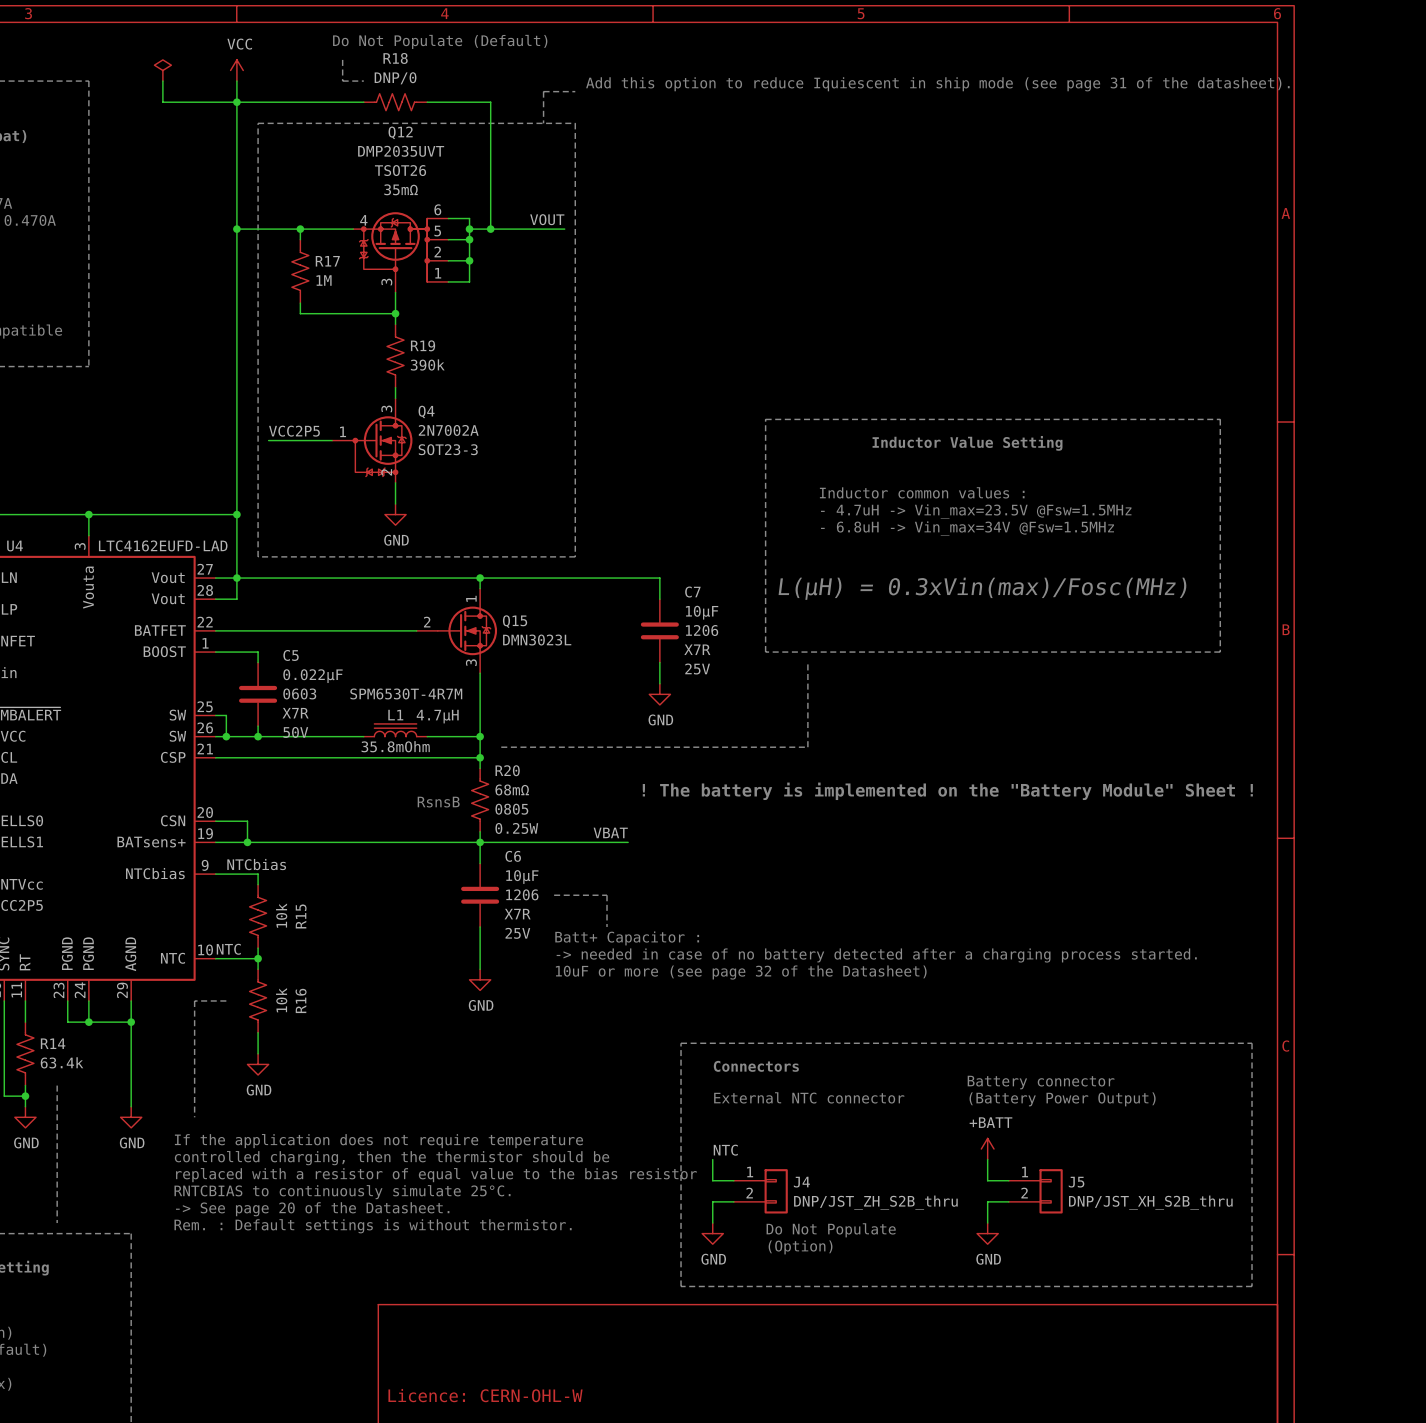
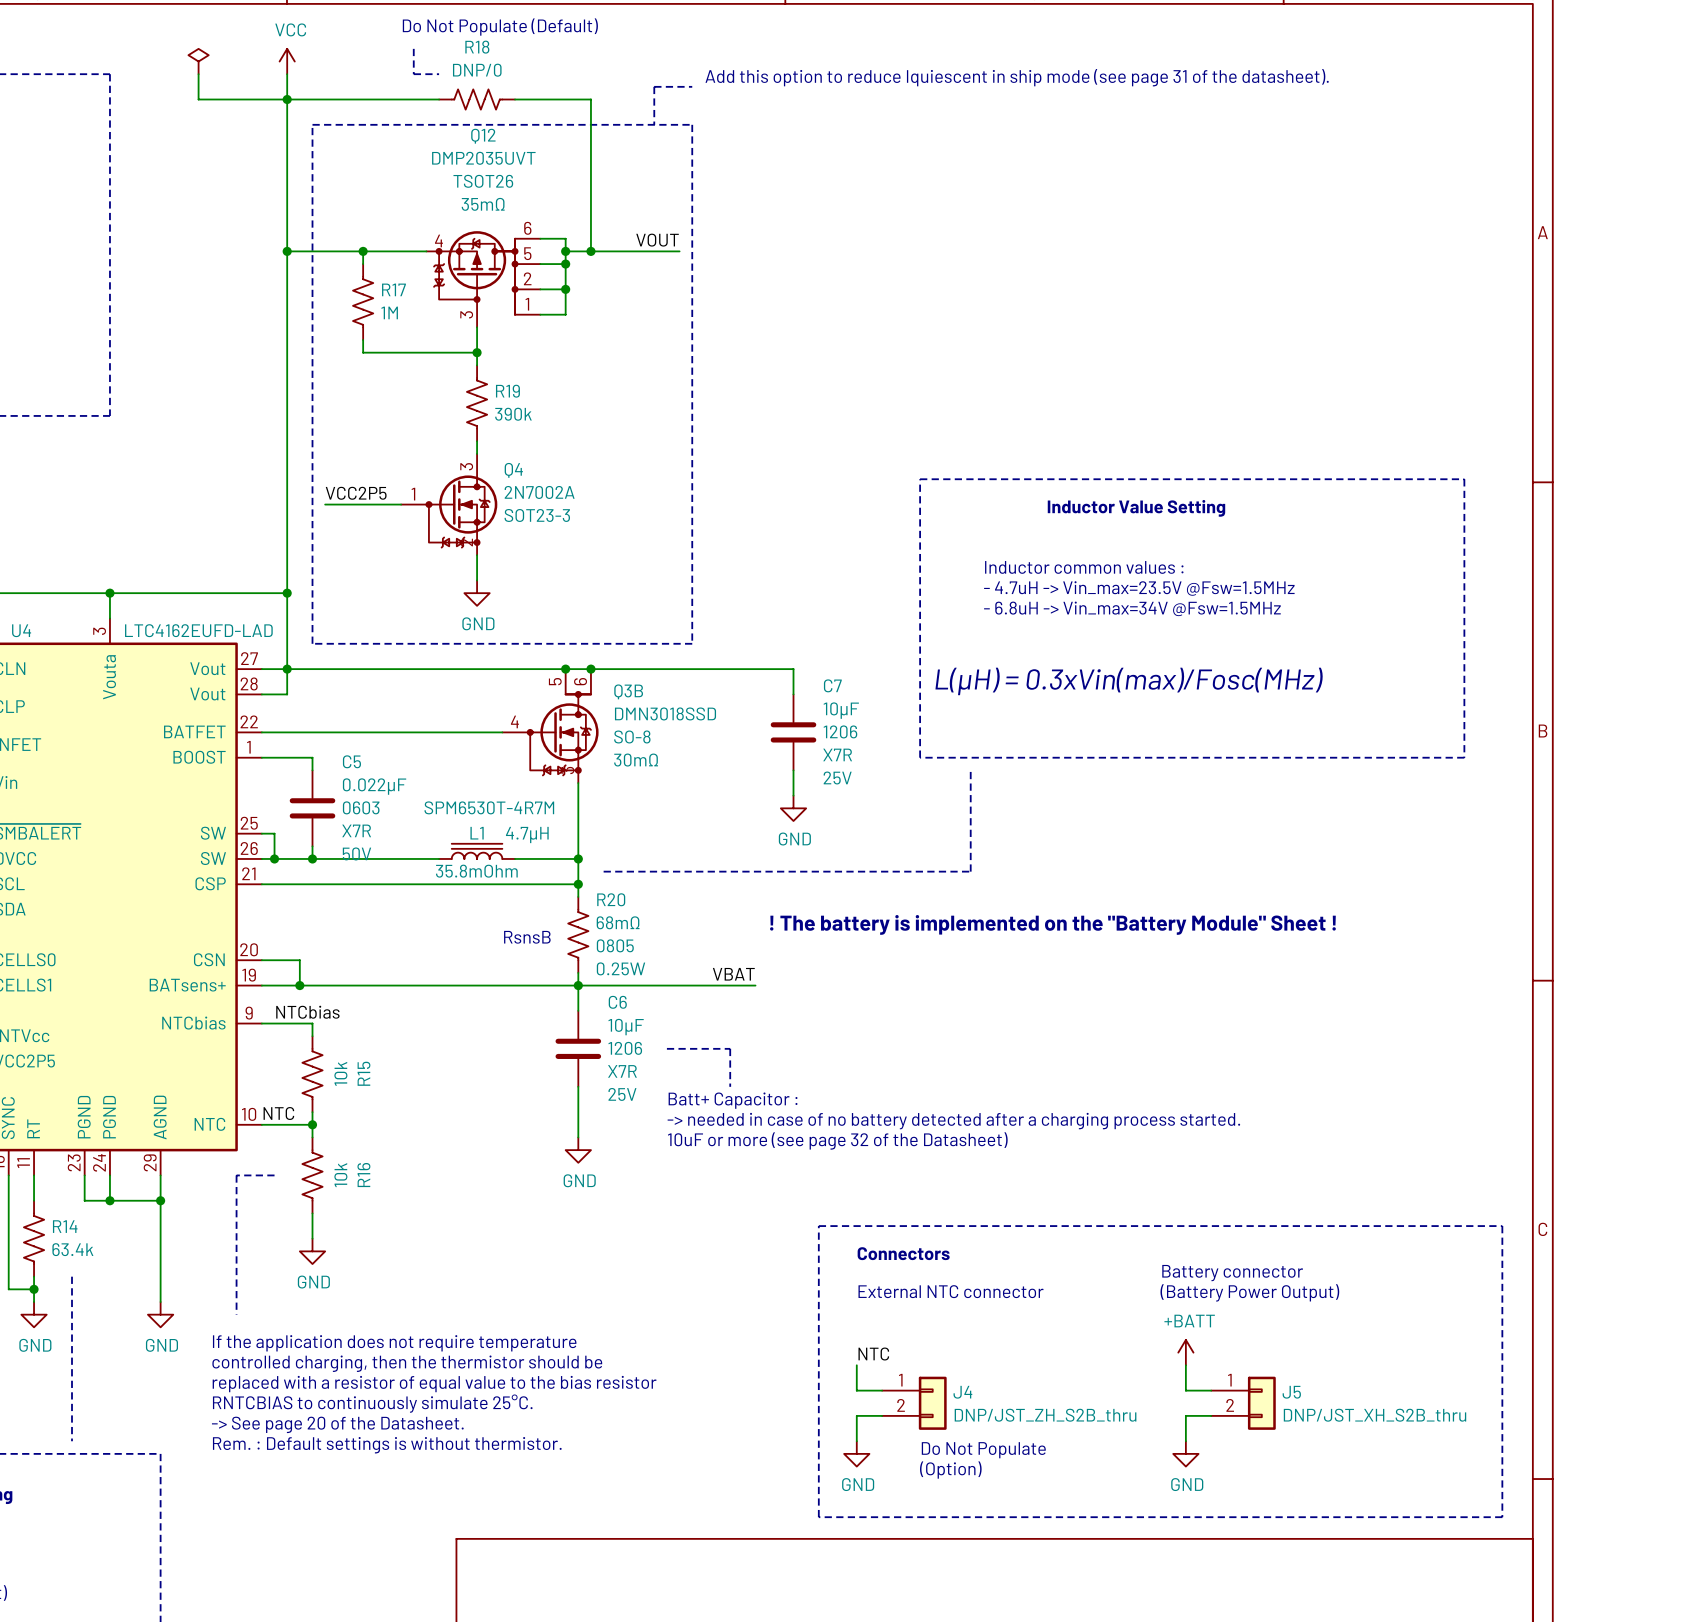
junction: none -> (565, 669)
wire: (480, 578) (480, 588) -> none
junction: (480, 578) -> none
junction: none -> (590, 669)
Q3B: none -> DMN3018SSD (550, 726)
Q15: DMN3023L (456, 630) -> none

